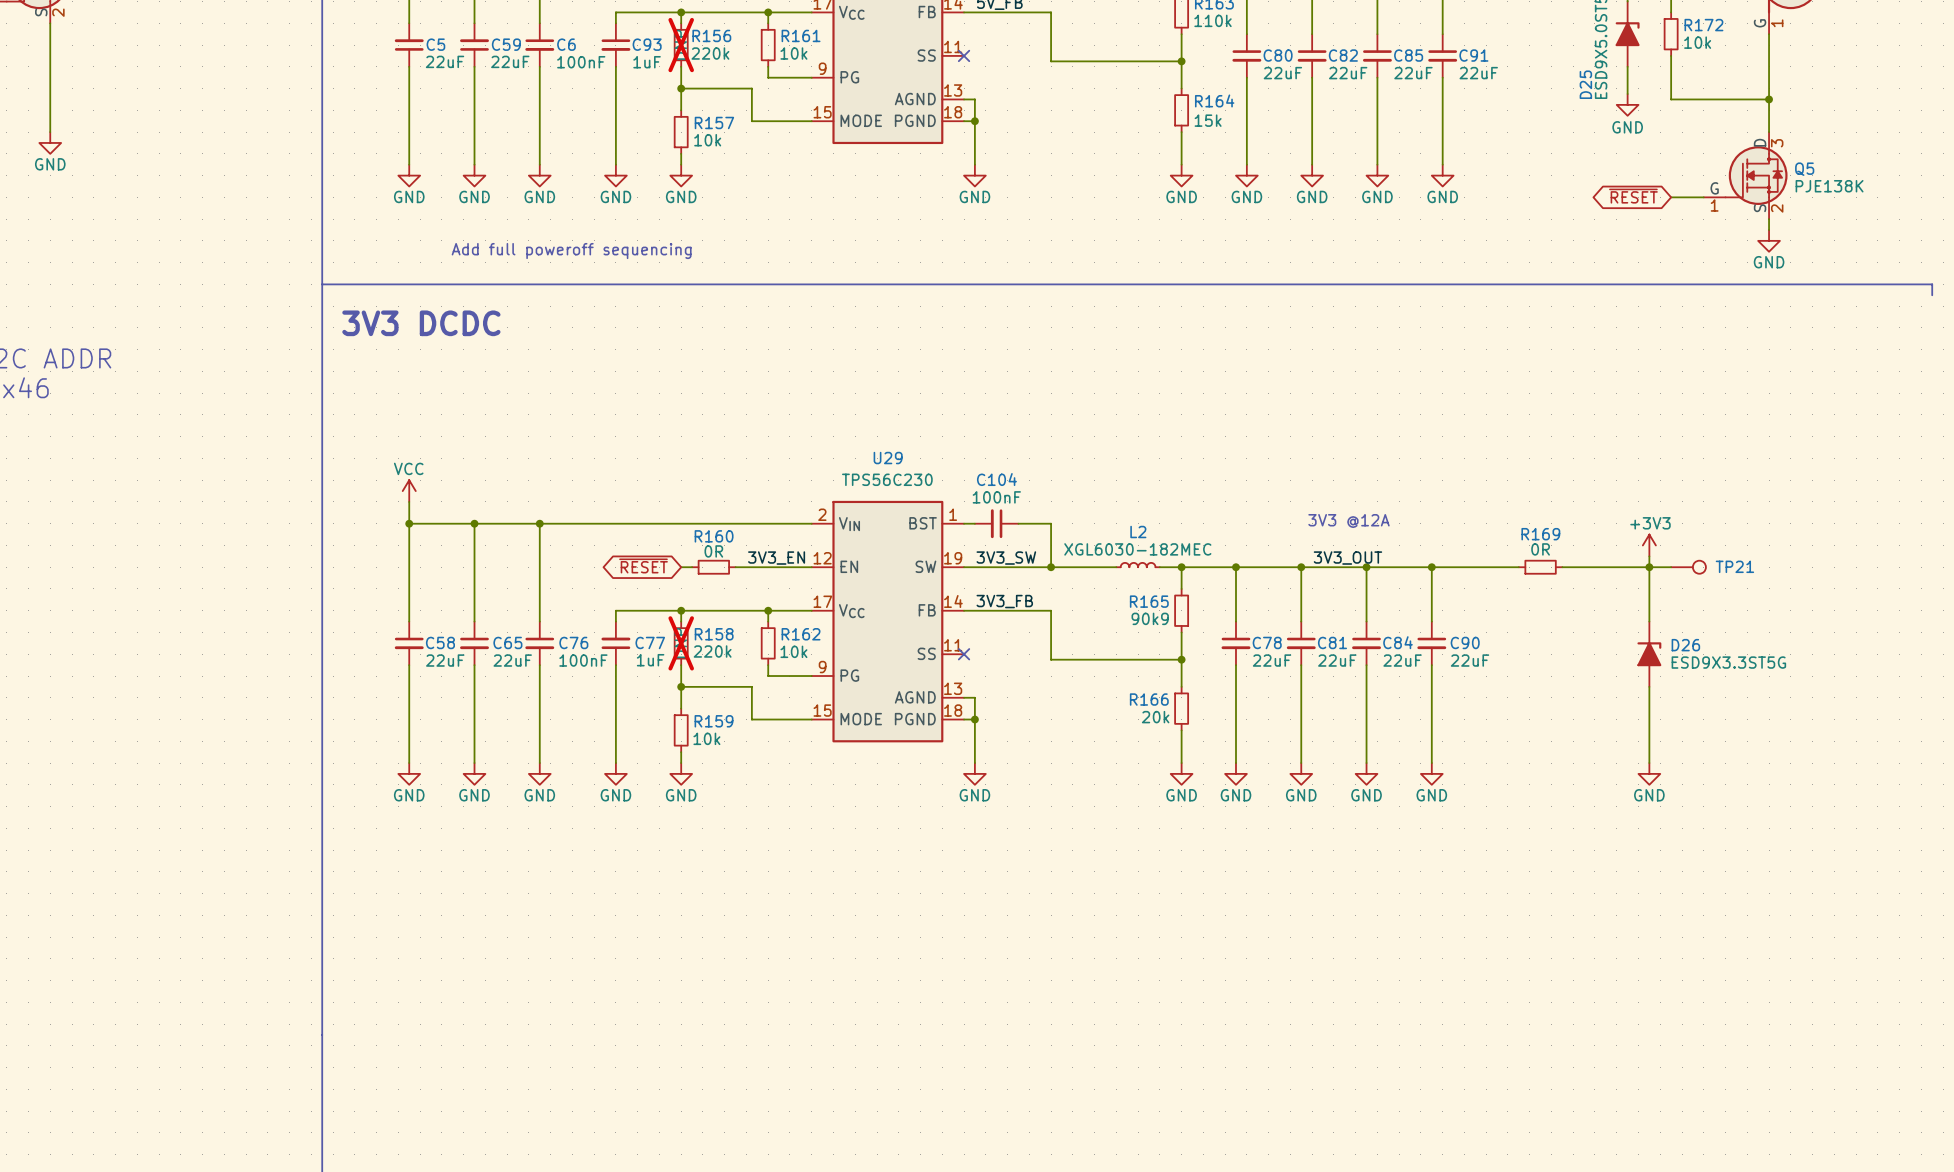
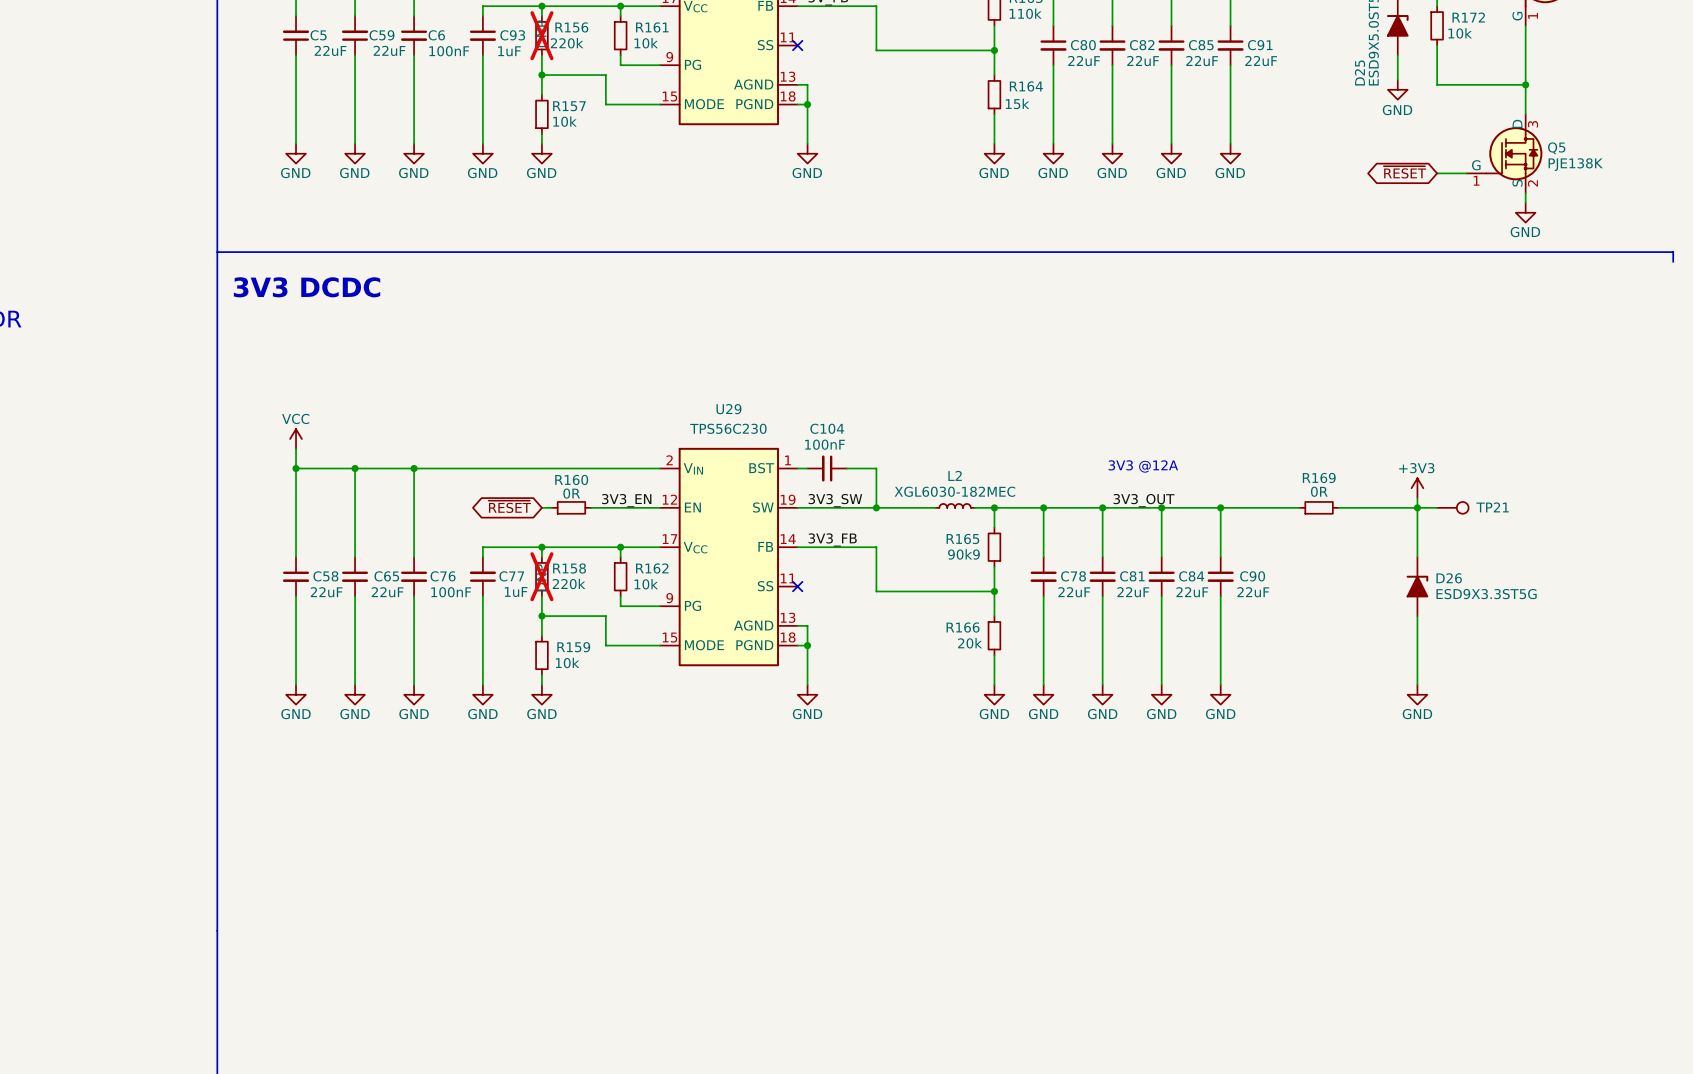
text: Add full poweroff sequencing (571, 251) -> none

